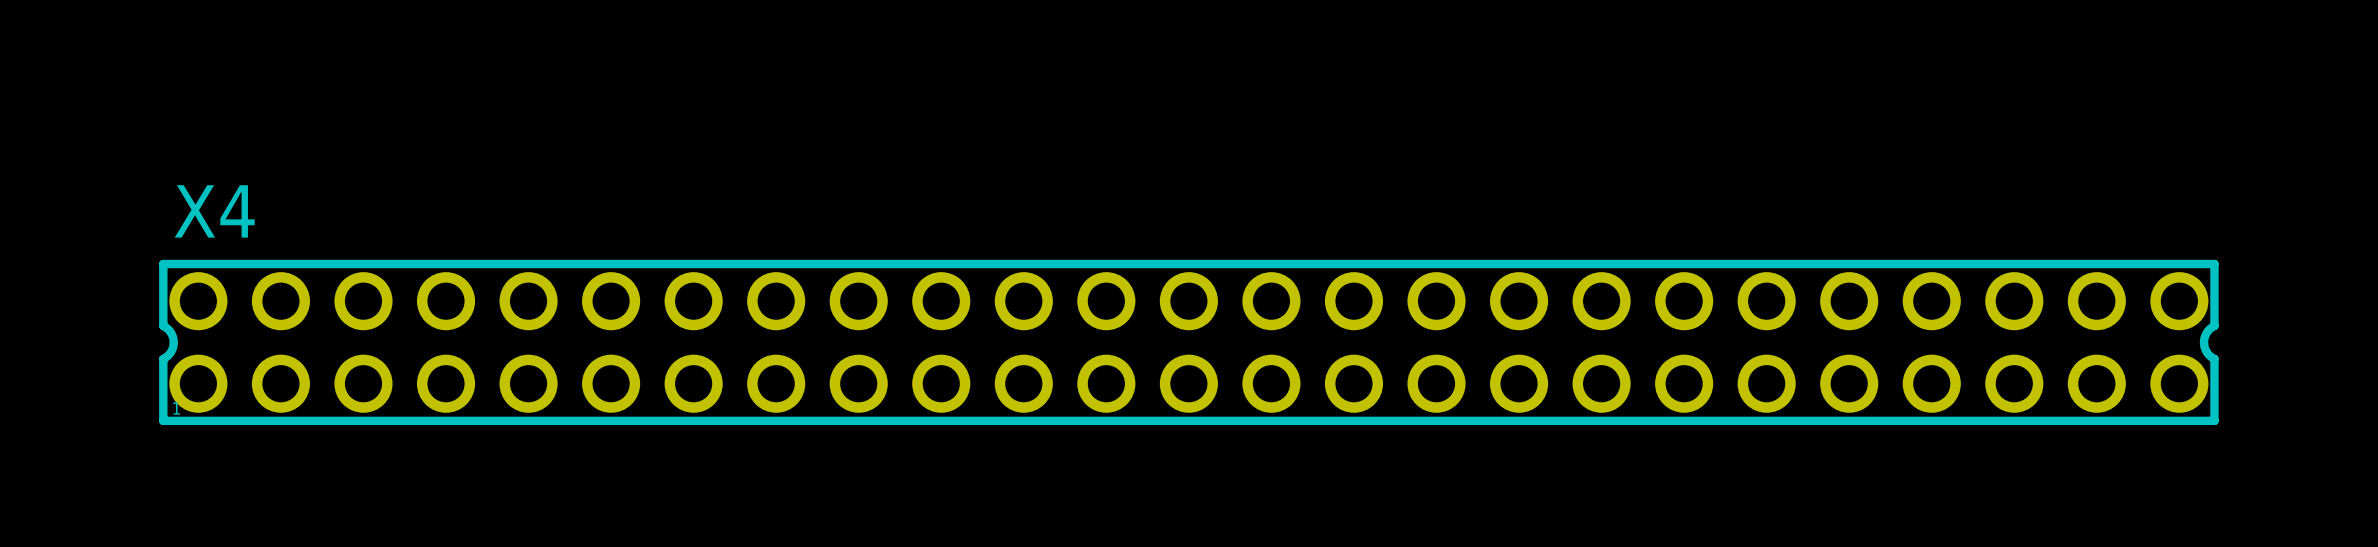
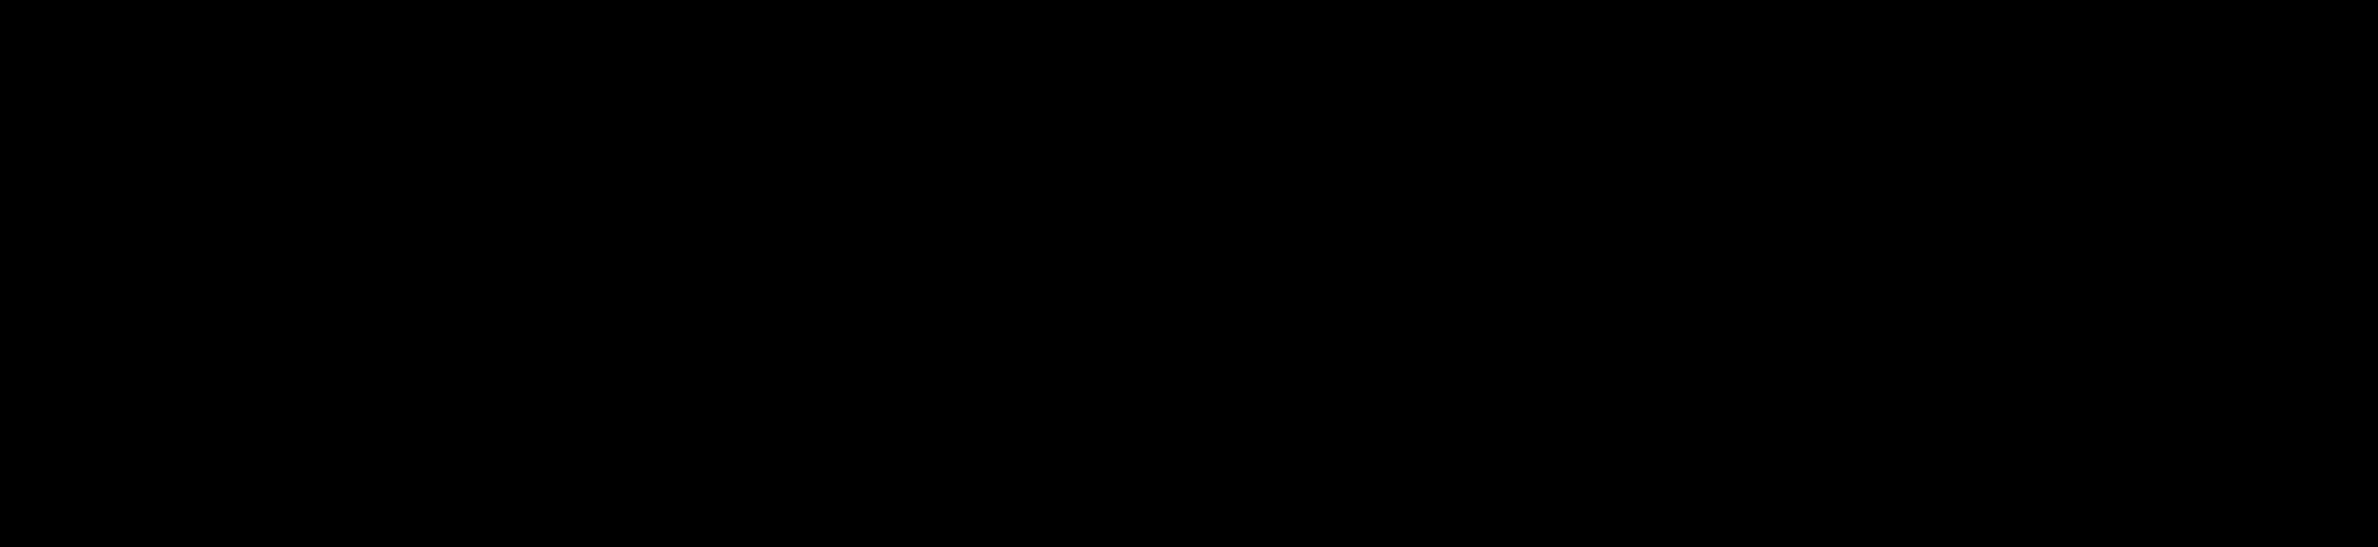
X4: (1188, 342) -> none

